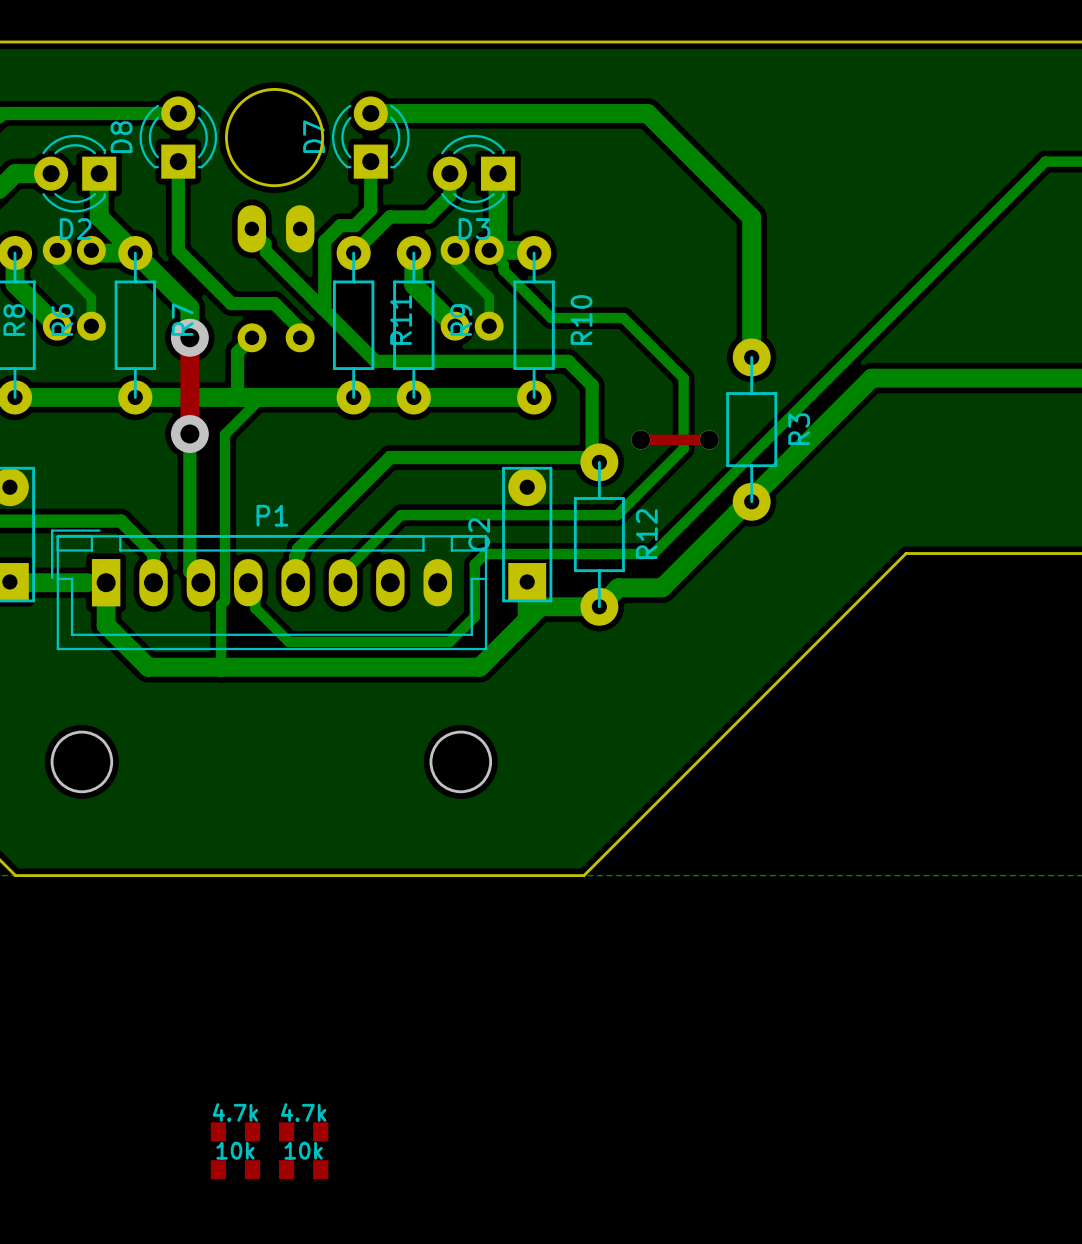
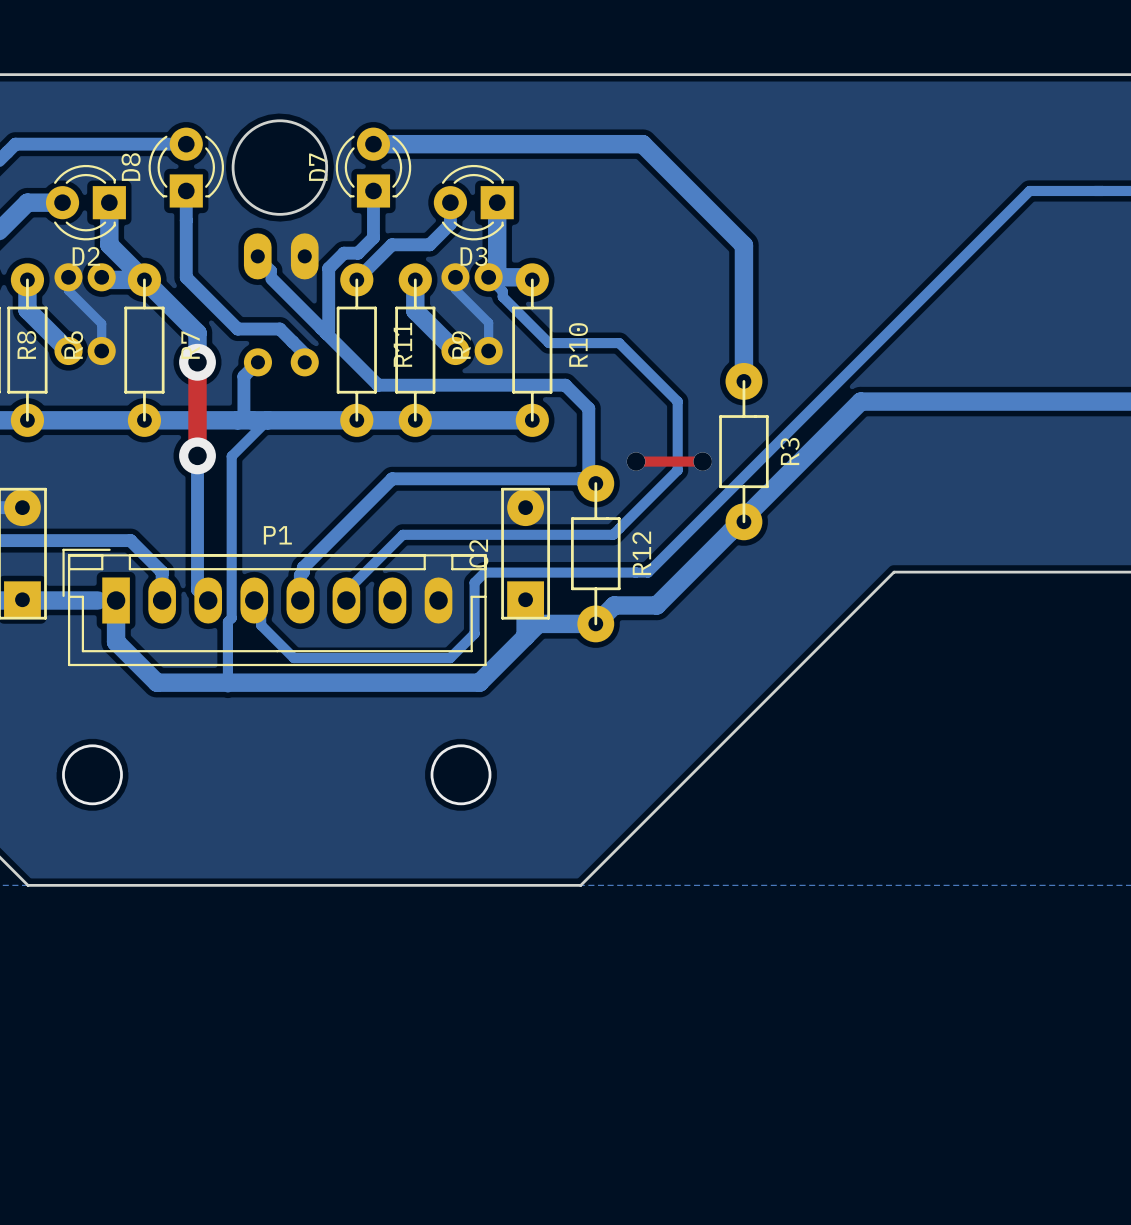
part: 4.7k (235, 1131) -> none
part: 4.7k (303, 1131) -> none
part: 10k (235, 1169) -> none
part: 10k (303, 1169) -> none

